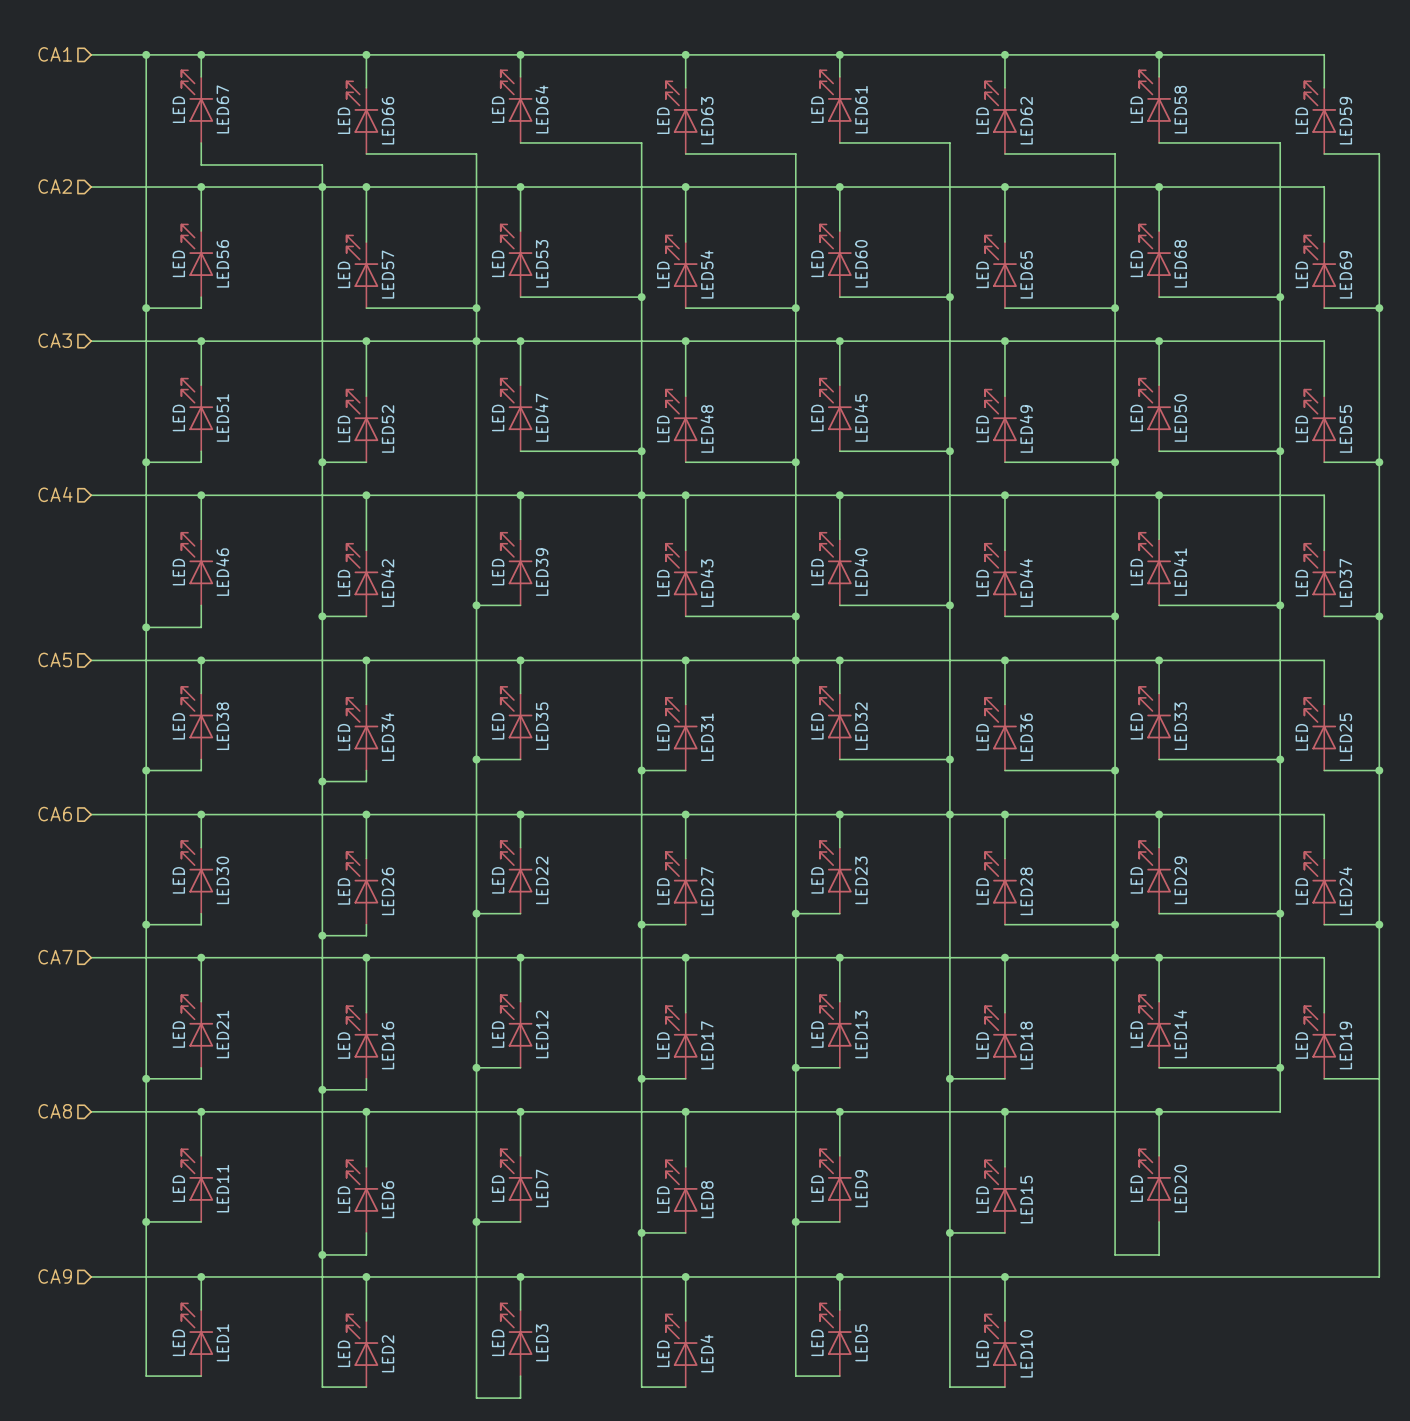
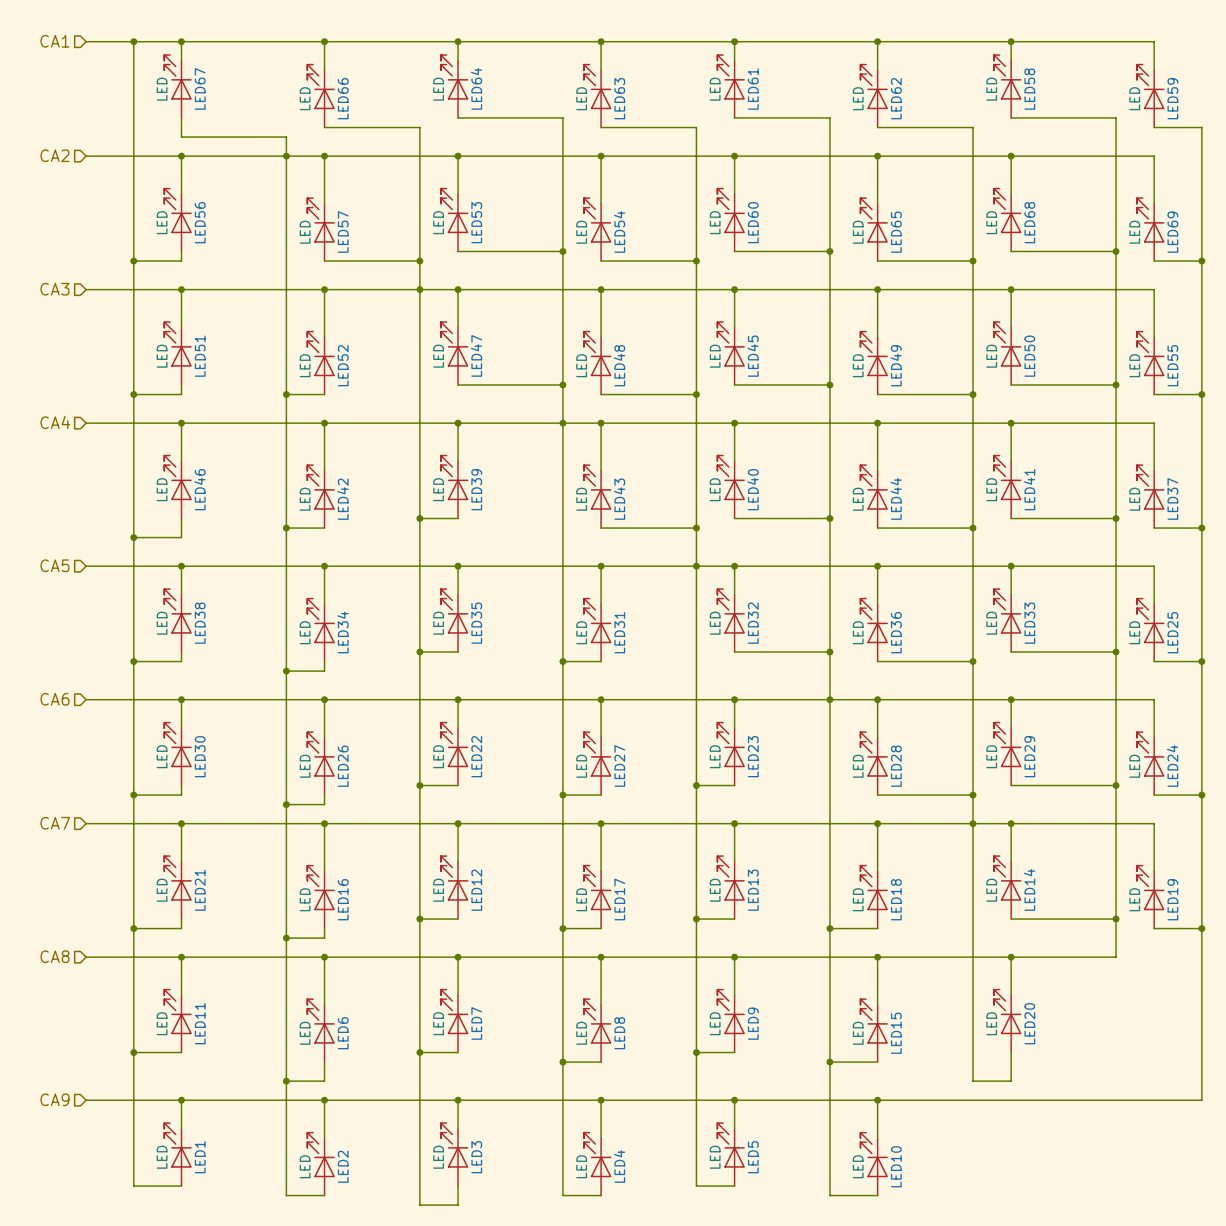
junction: none -> (1201, 928)

